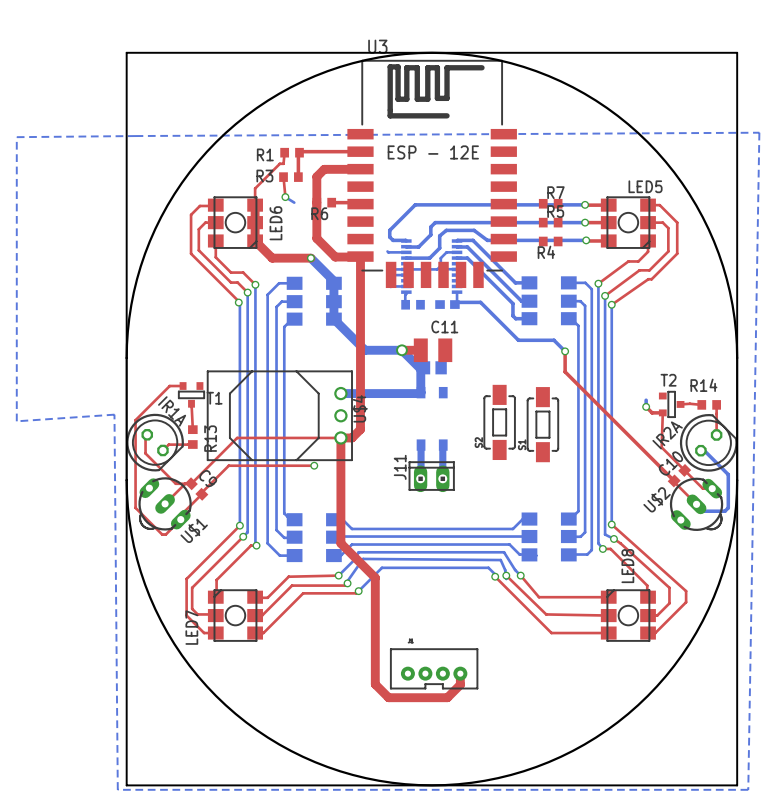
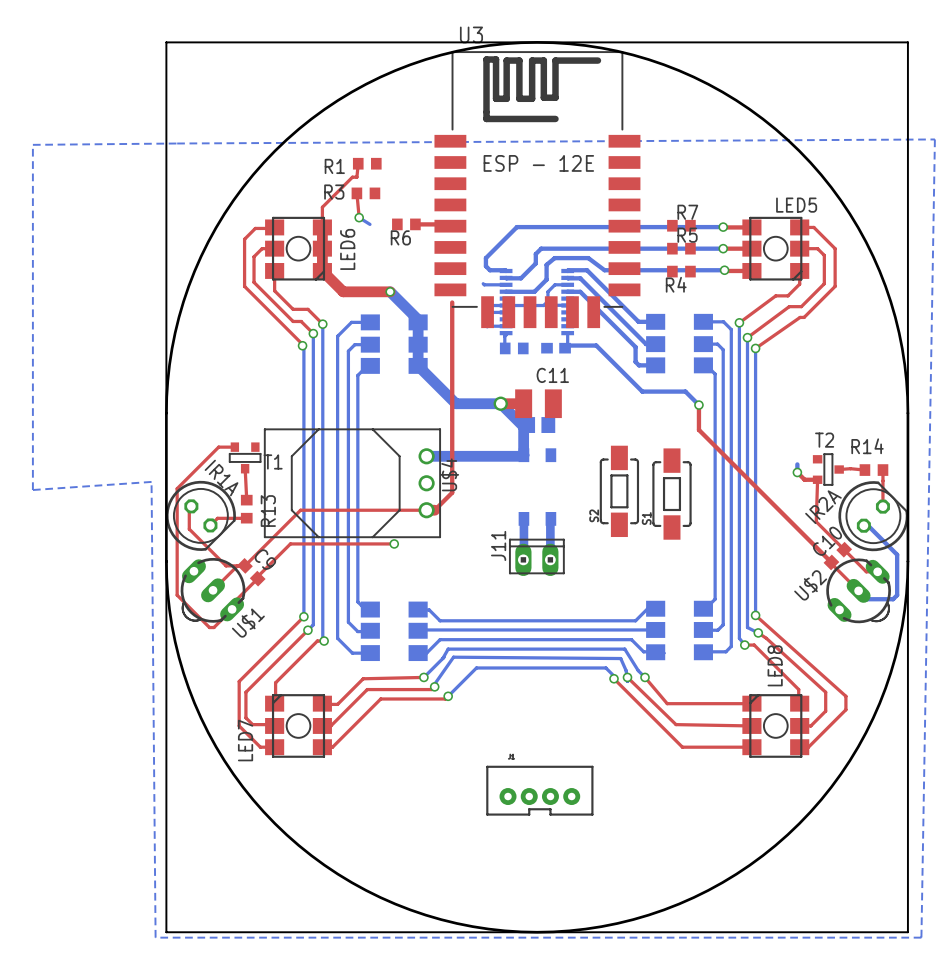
top track: (360, 151) (299, 151) (298, 177) -> none
top track: (360, 169) (324, 169) (316, 176) (316, 238) (335, 257) (360, 256) (360, 429) (352, 437) (347, 437) -> (452, 302) (452, 492) (434, 510)
top track: (340, 437) (340, 543) (375, 577) (375, 684) (388, 697) (447, 697) (460, 684) (460, 673) -> none

